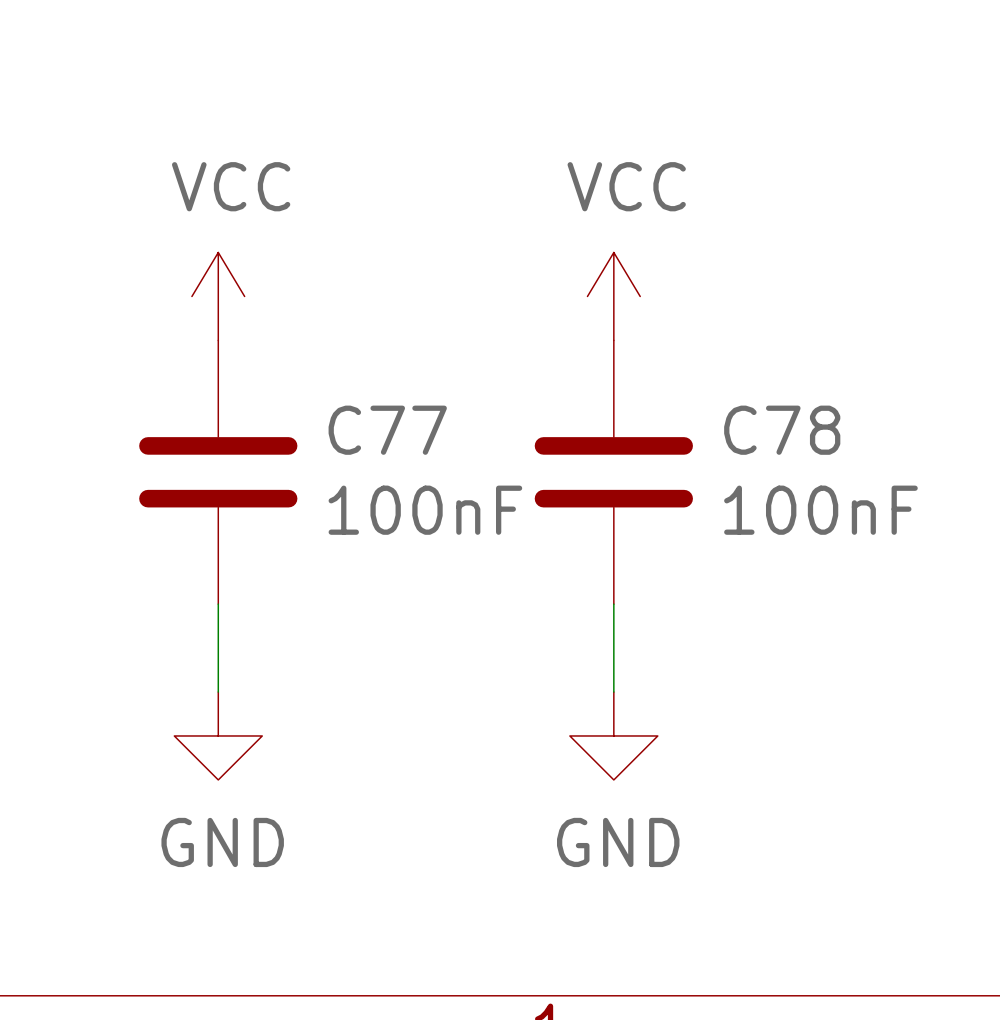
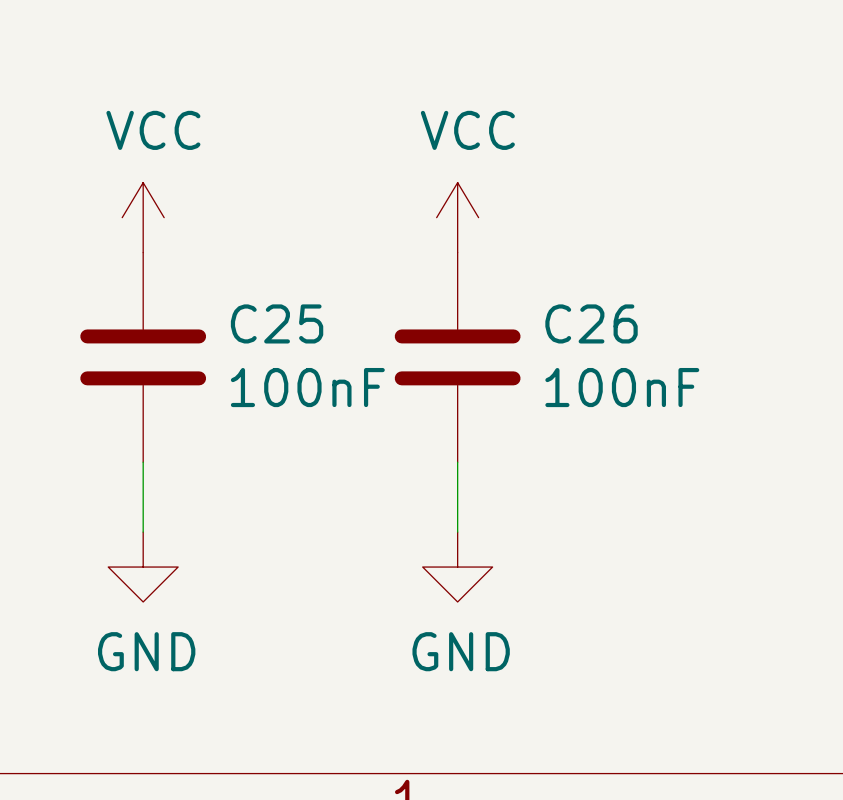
C77 name: C77 (387, 430) -> C25 (277, 323)
C78 name: C78 (782, 430) -> C26 (591, 323)

